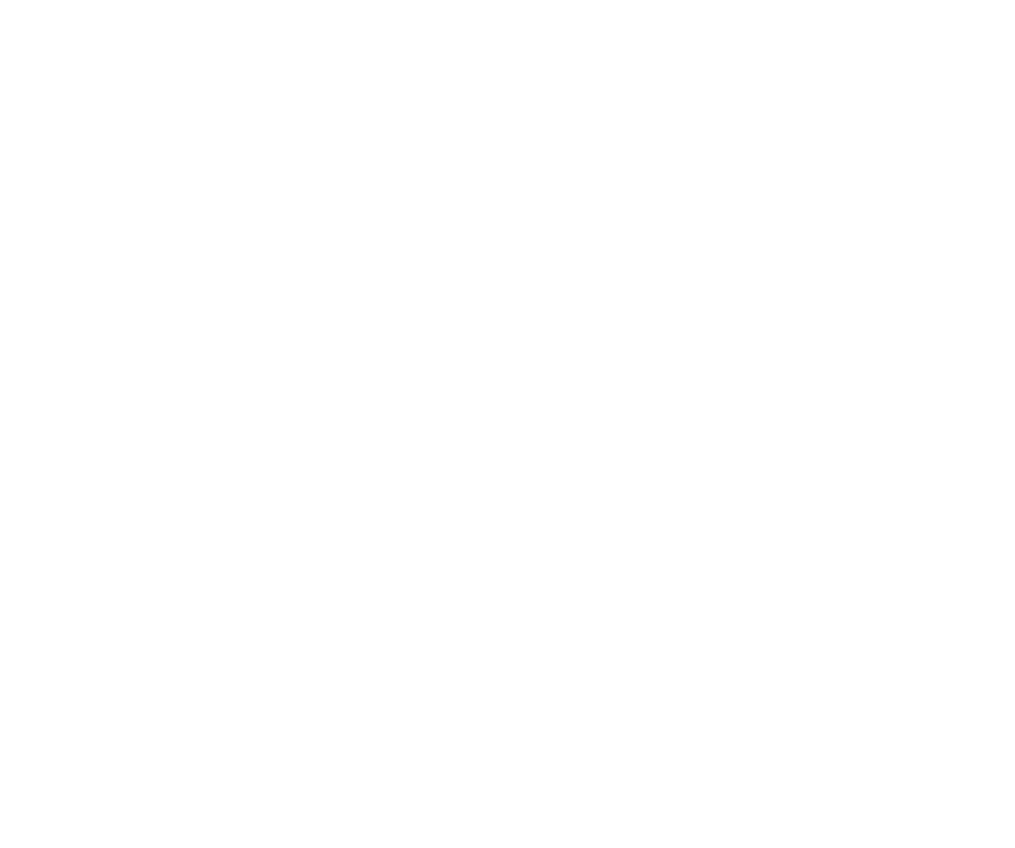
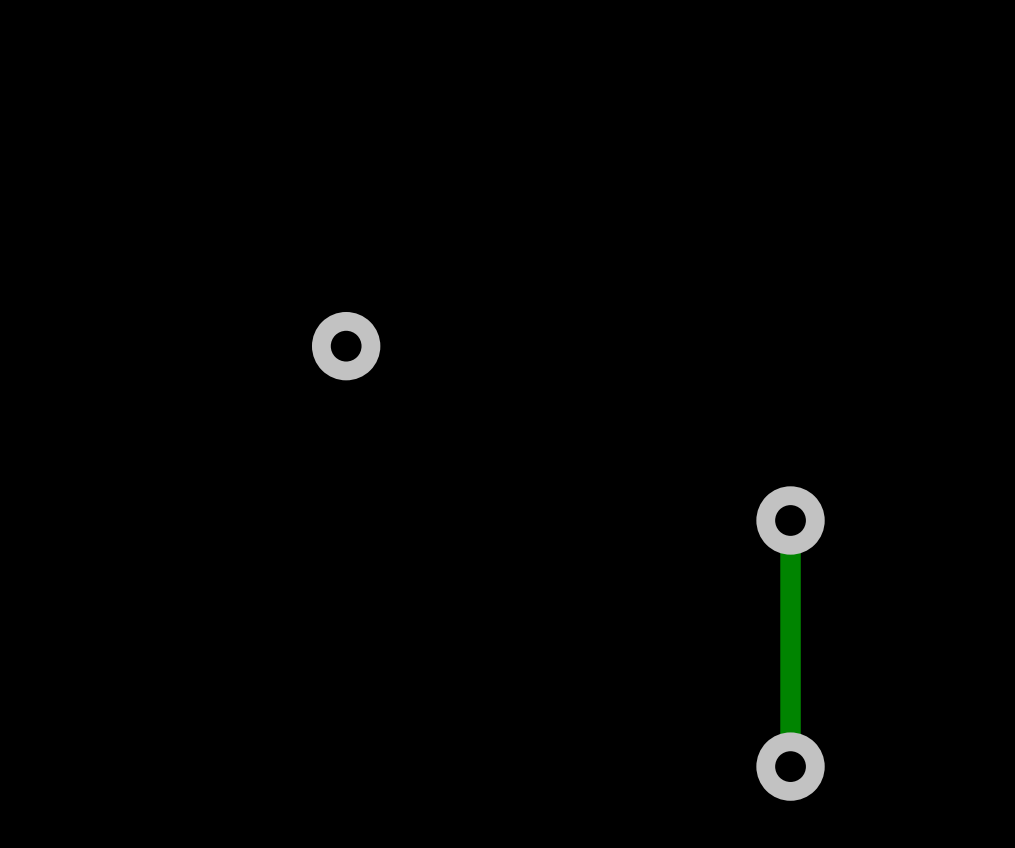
via: none -> (346, 346)
track: none -> (790, 520) (790, 766)
via: none -> (790, 520)
via: none -> (790, 766)

